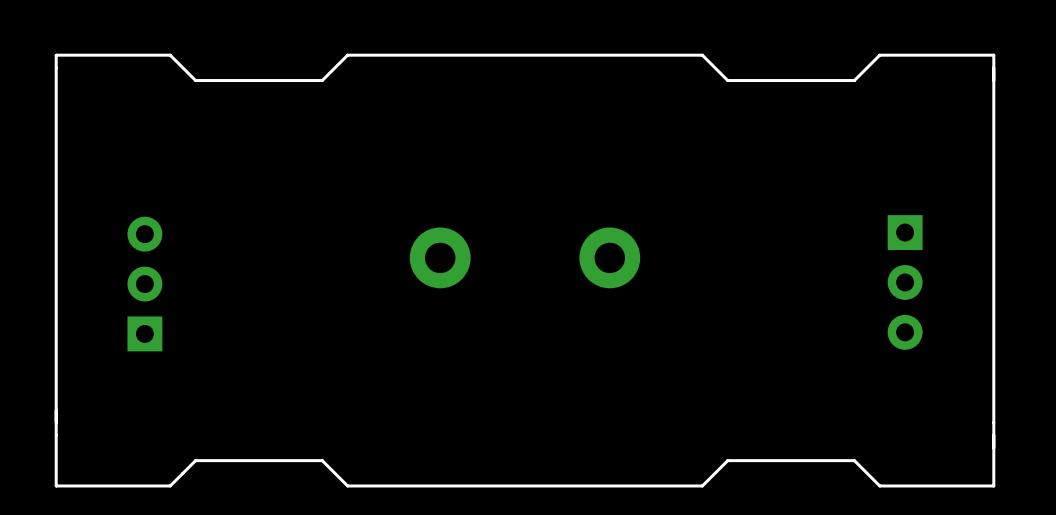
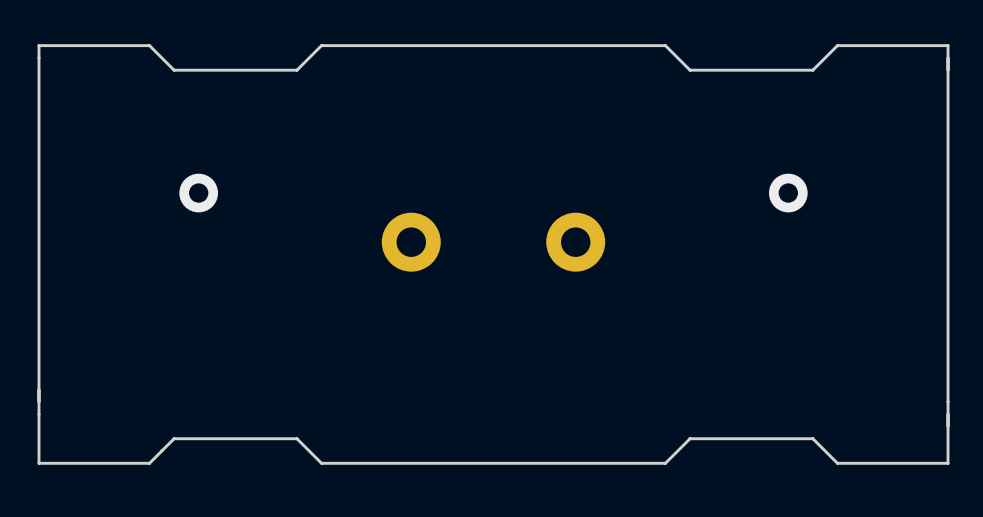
via: none -> (198, 193)
via: none -> (788, 193)
part: (905, 282) -> none
part: (144, 284) -> none

